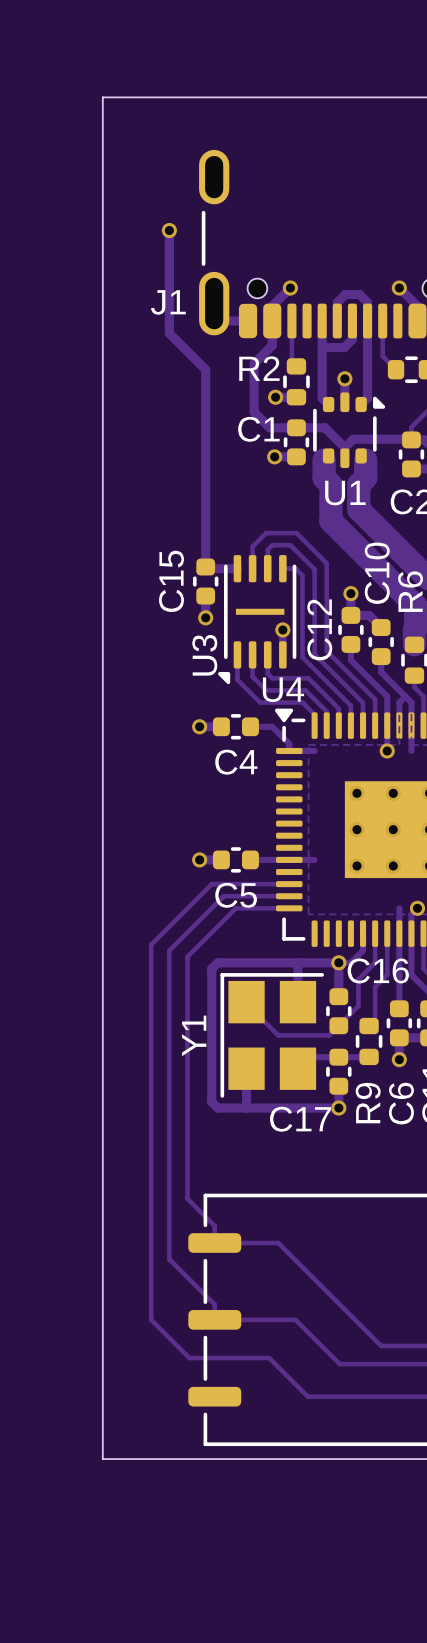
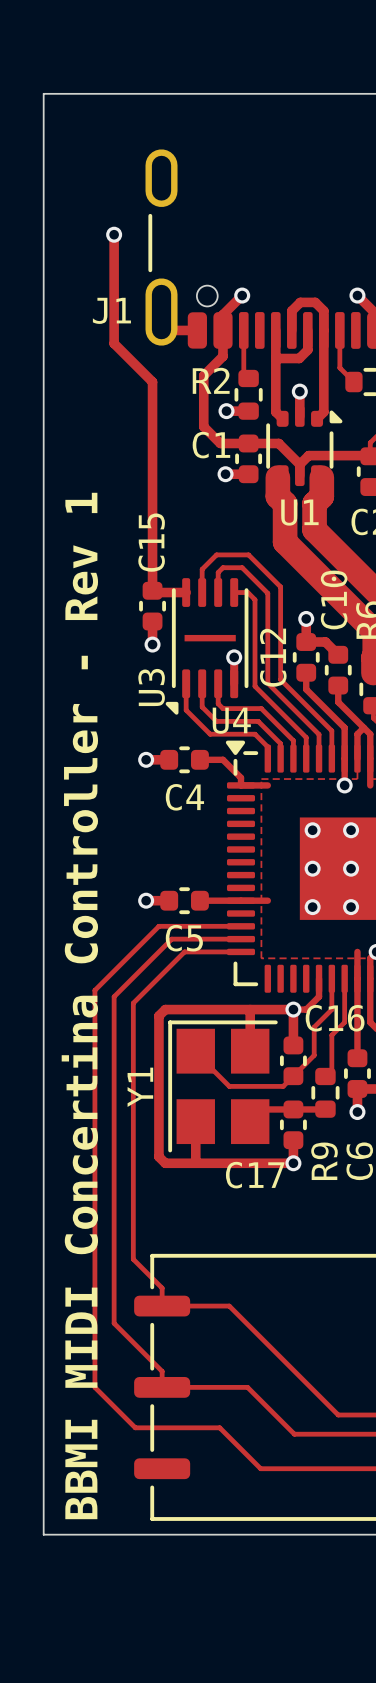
C15 name position: C15 (171, 581) -> C15 (151, 542)
text: none -> BBMI MIDI Concertina Controller - Rev 1 (79, 1005)

